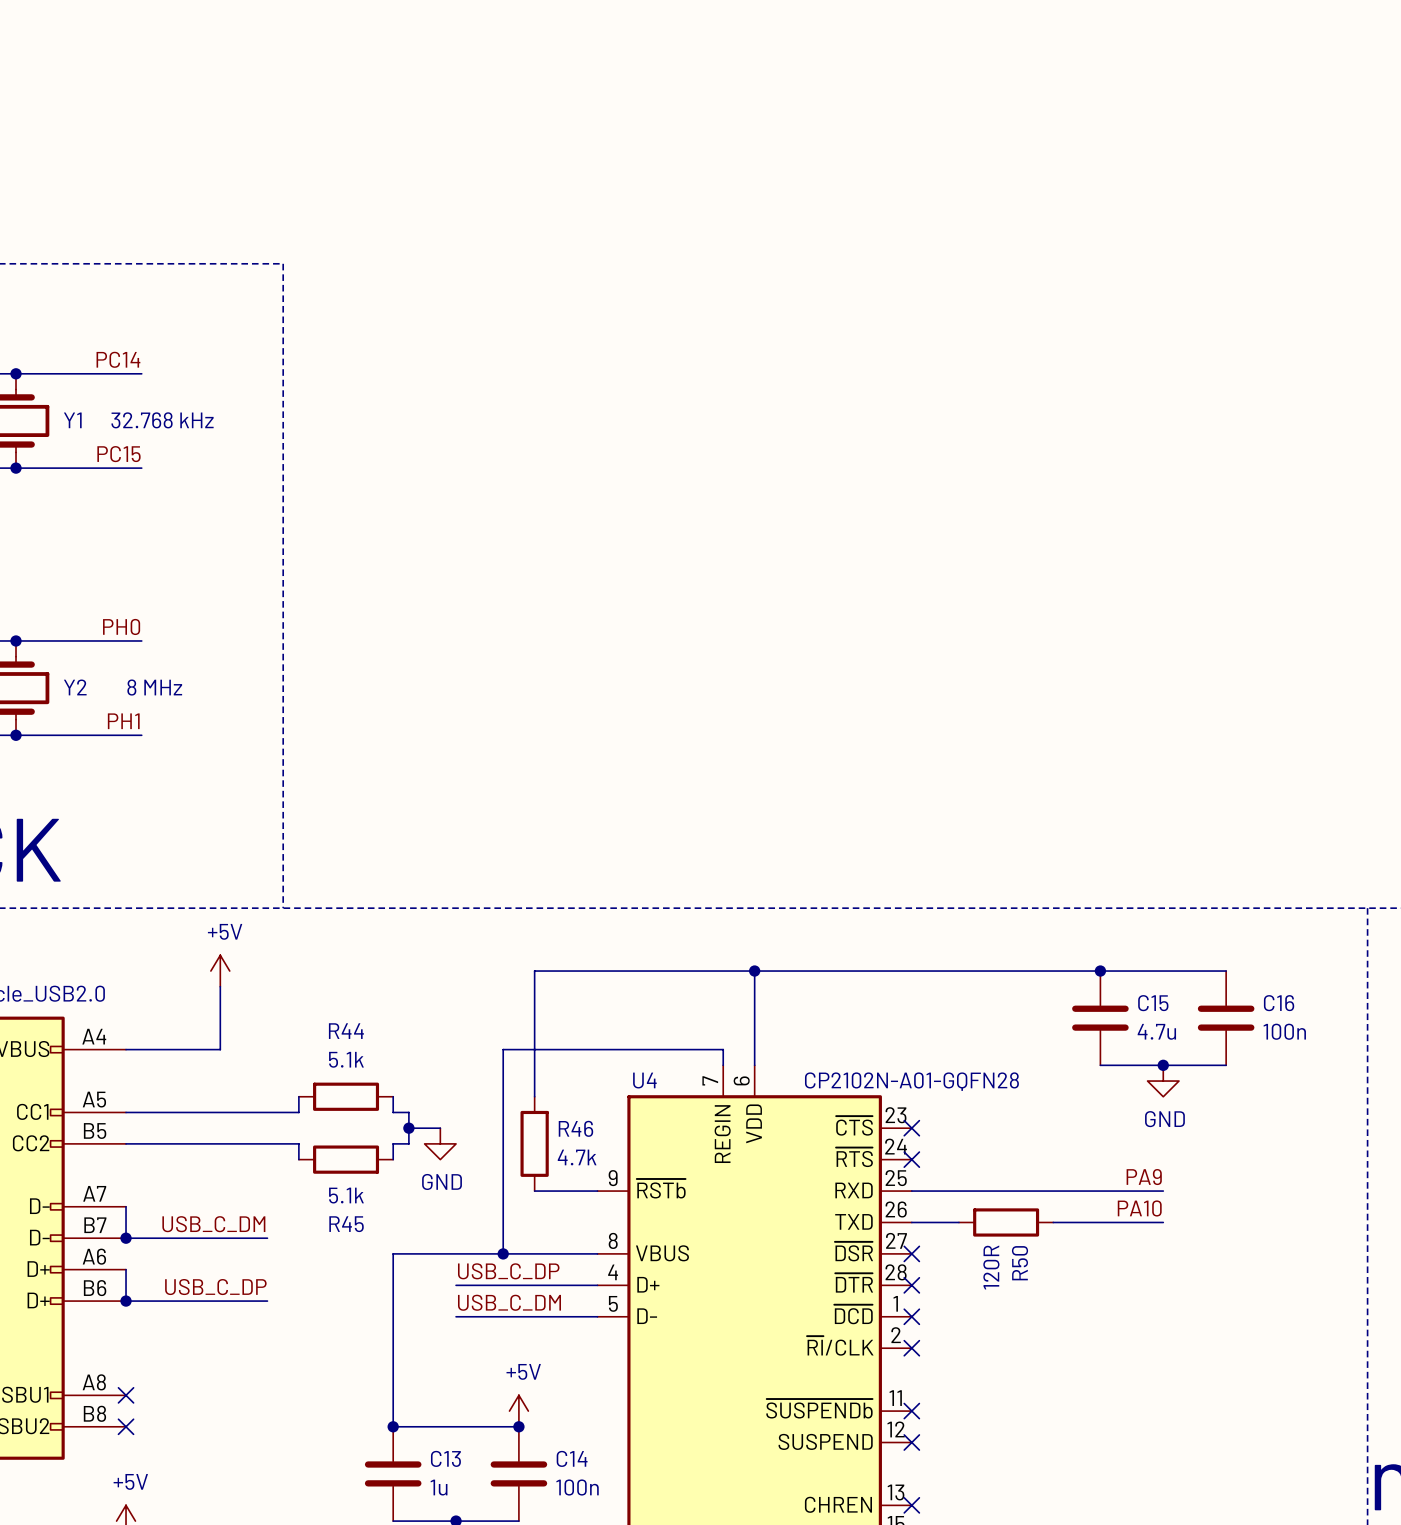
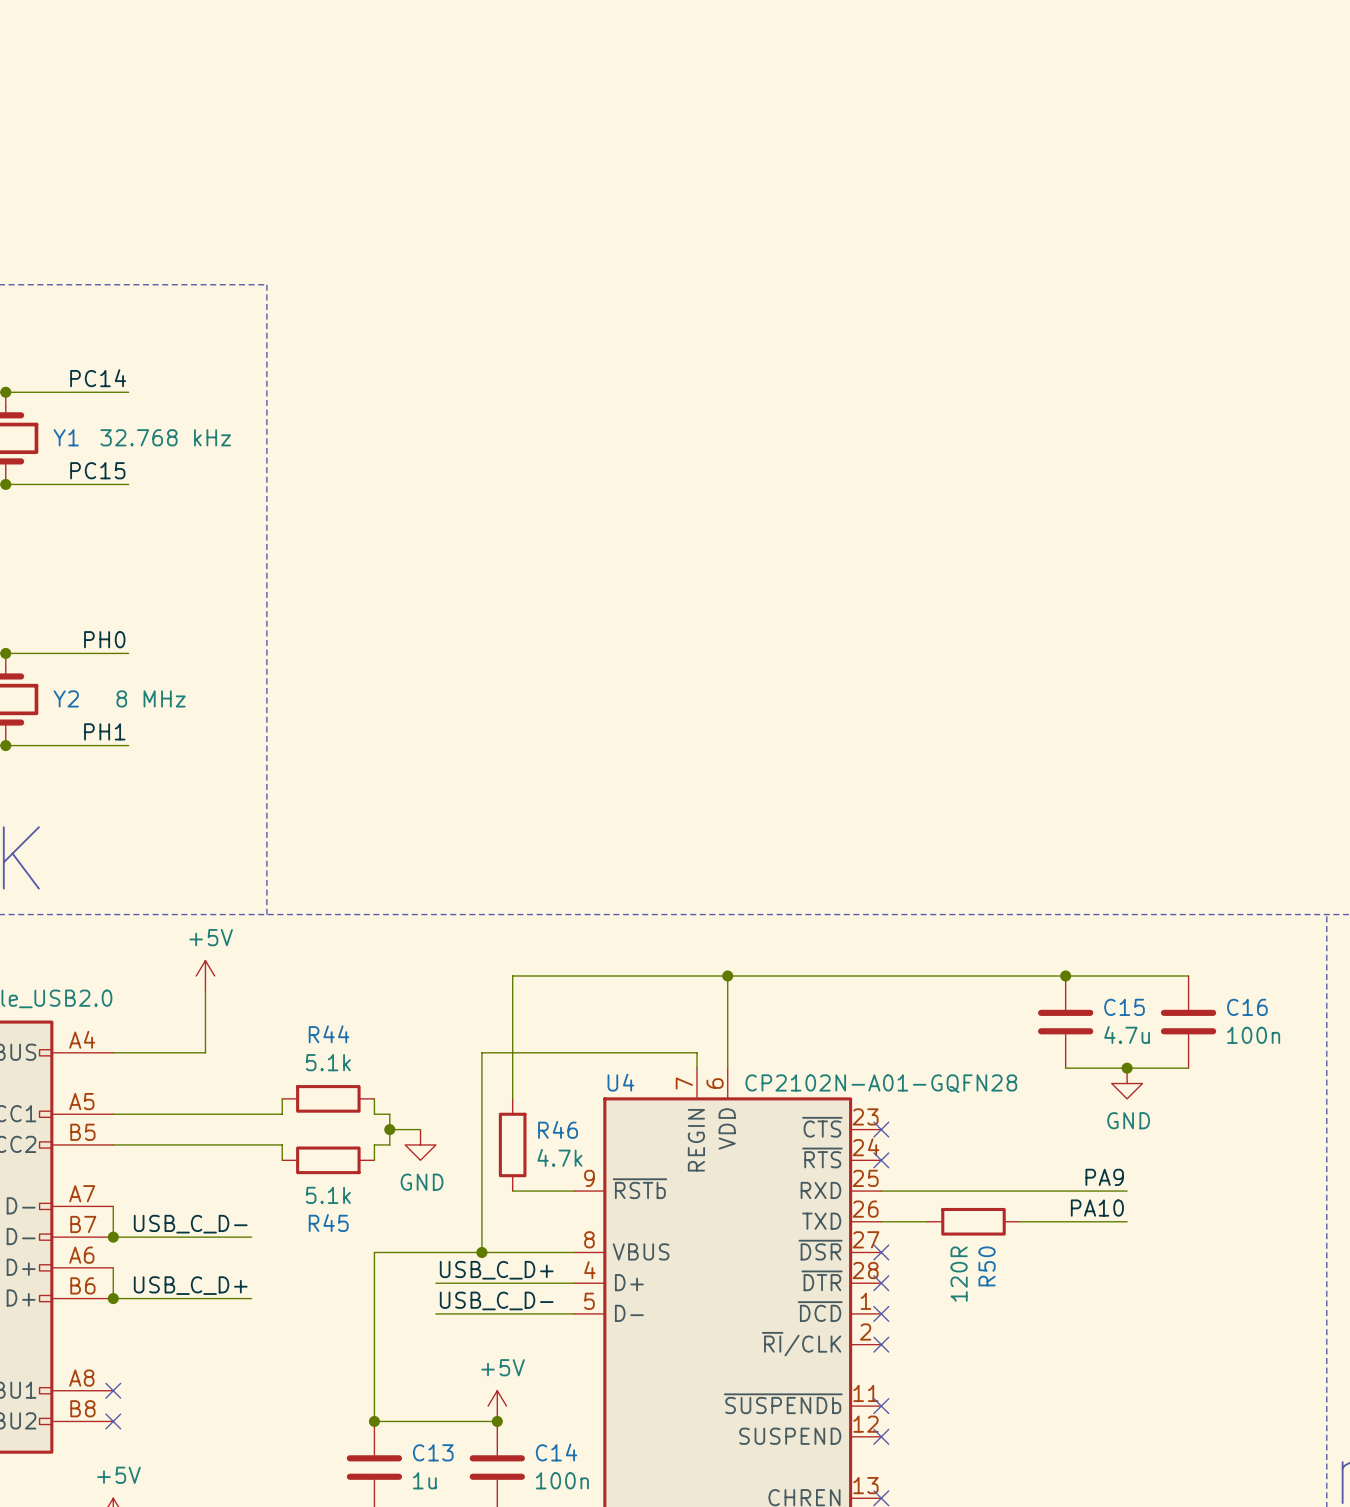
label: USB_C_DM (213, 1224) -> USB_C_D- (190, 1224)
label: USB_C_DP (508, 1271) -> USB_C_D+ (496, 1270)
label: USB_C_DP (215, 1287) -> USB_C_D+ (190, 1285)
label: USB_C_DM (509, 1302) -> USB_C_D- (496, 1300)

